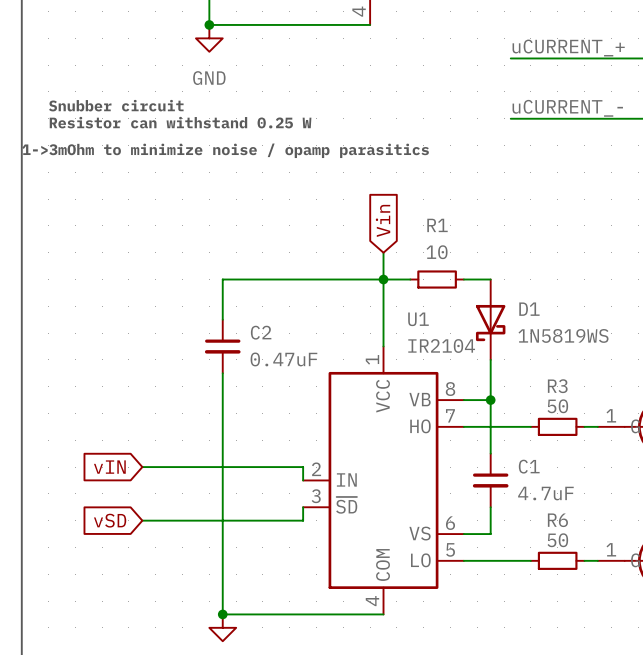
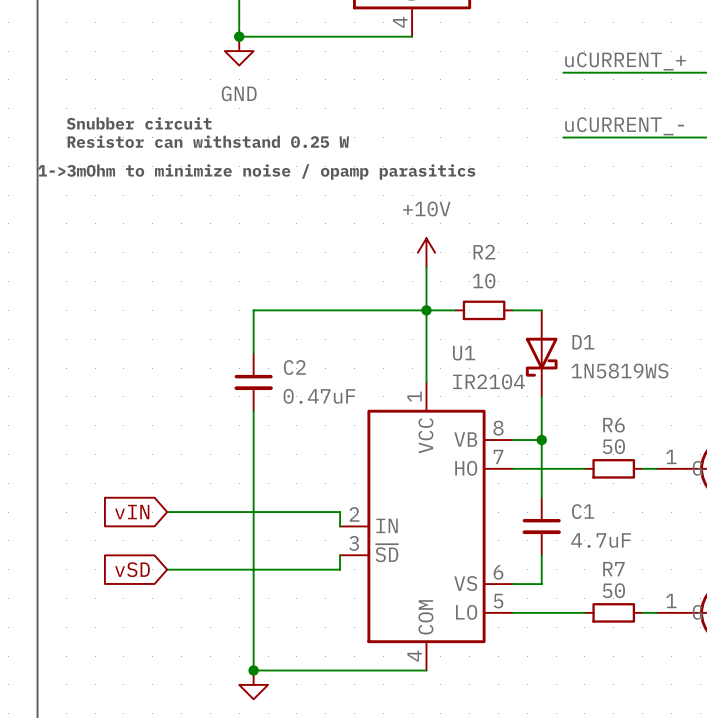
global label: Vin (383, 220) -> none
power symbol: none -> +10V (426, 252)
R1 name: R1 (437, 225) -> R2 (484, 252)
wire: none -> (426, 267) (426, 281)
R3 name: R3 (557, 386) -> R6 (614, 425)
R6 name: R6 (557, 520) -> R7 (613, 569)

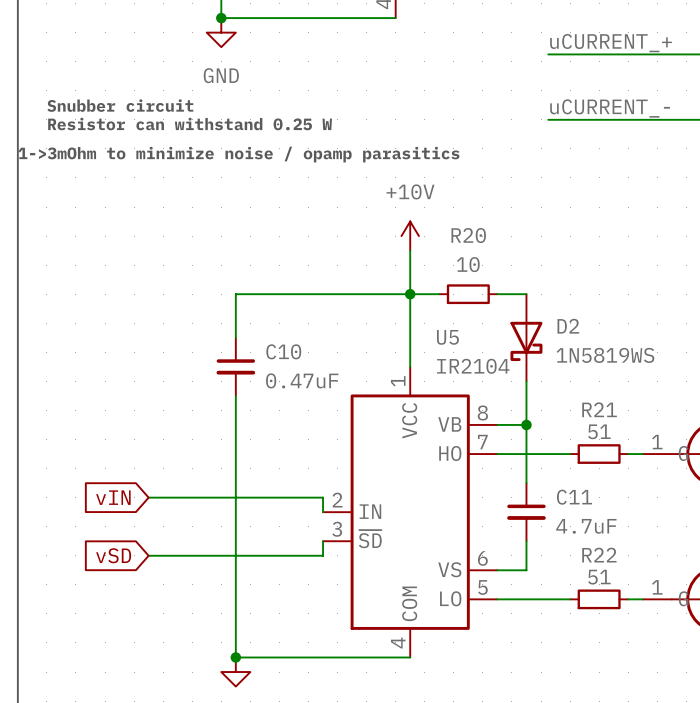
R2 name: R2 (484, 252) -> R20 (468, 235)
D1 name: D1 (583, 342) -> D2 (568, 326)
U1 name: U1 (464, 353) -> U5 (447, 337)
C2 name: C2 (294, 367) -> C10 (283, 351)
R6 name: R6 (614, 425) -> R21 (599, 409)
R6 value: 50 (613, 446) -> 51 (599, 431)
C1 name: C1 (583, 511) -> C11 (574, 497)
R7 name: R7 (613, 569) -> R22 (599, 555)
R7 value: 50 (613, 590) -> 51 (599, 577)

